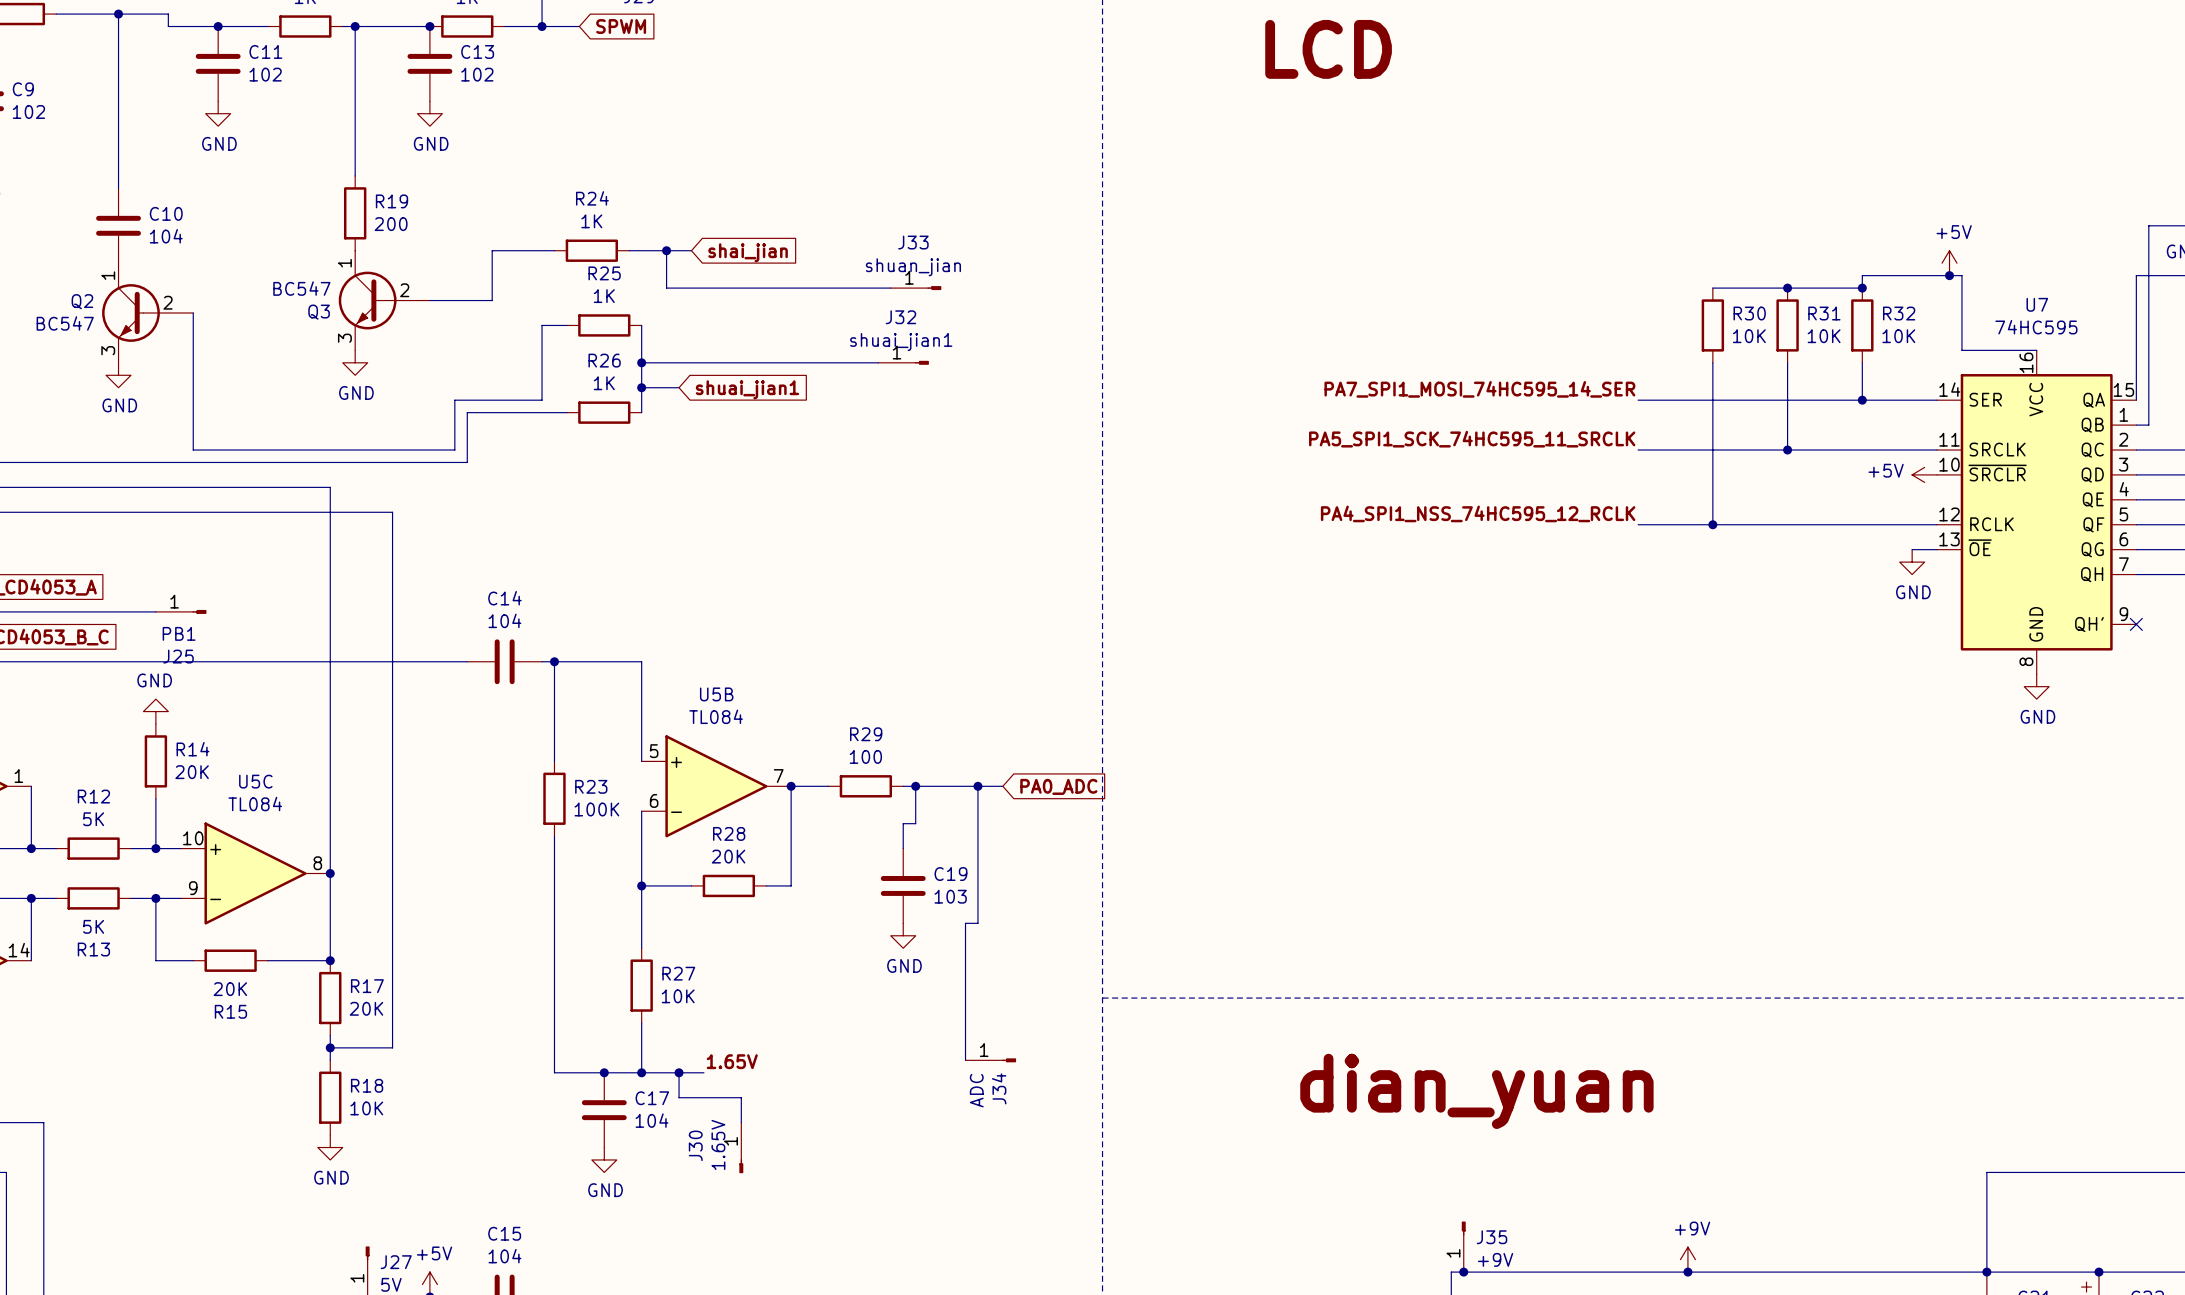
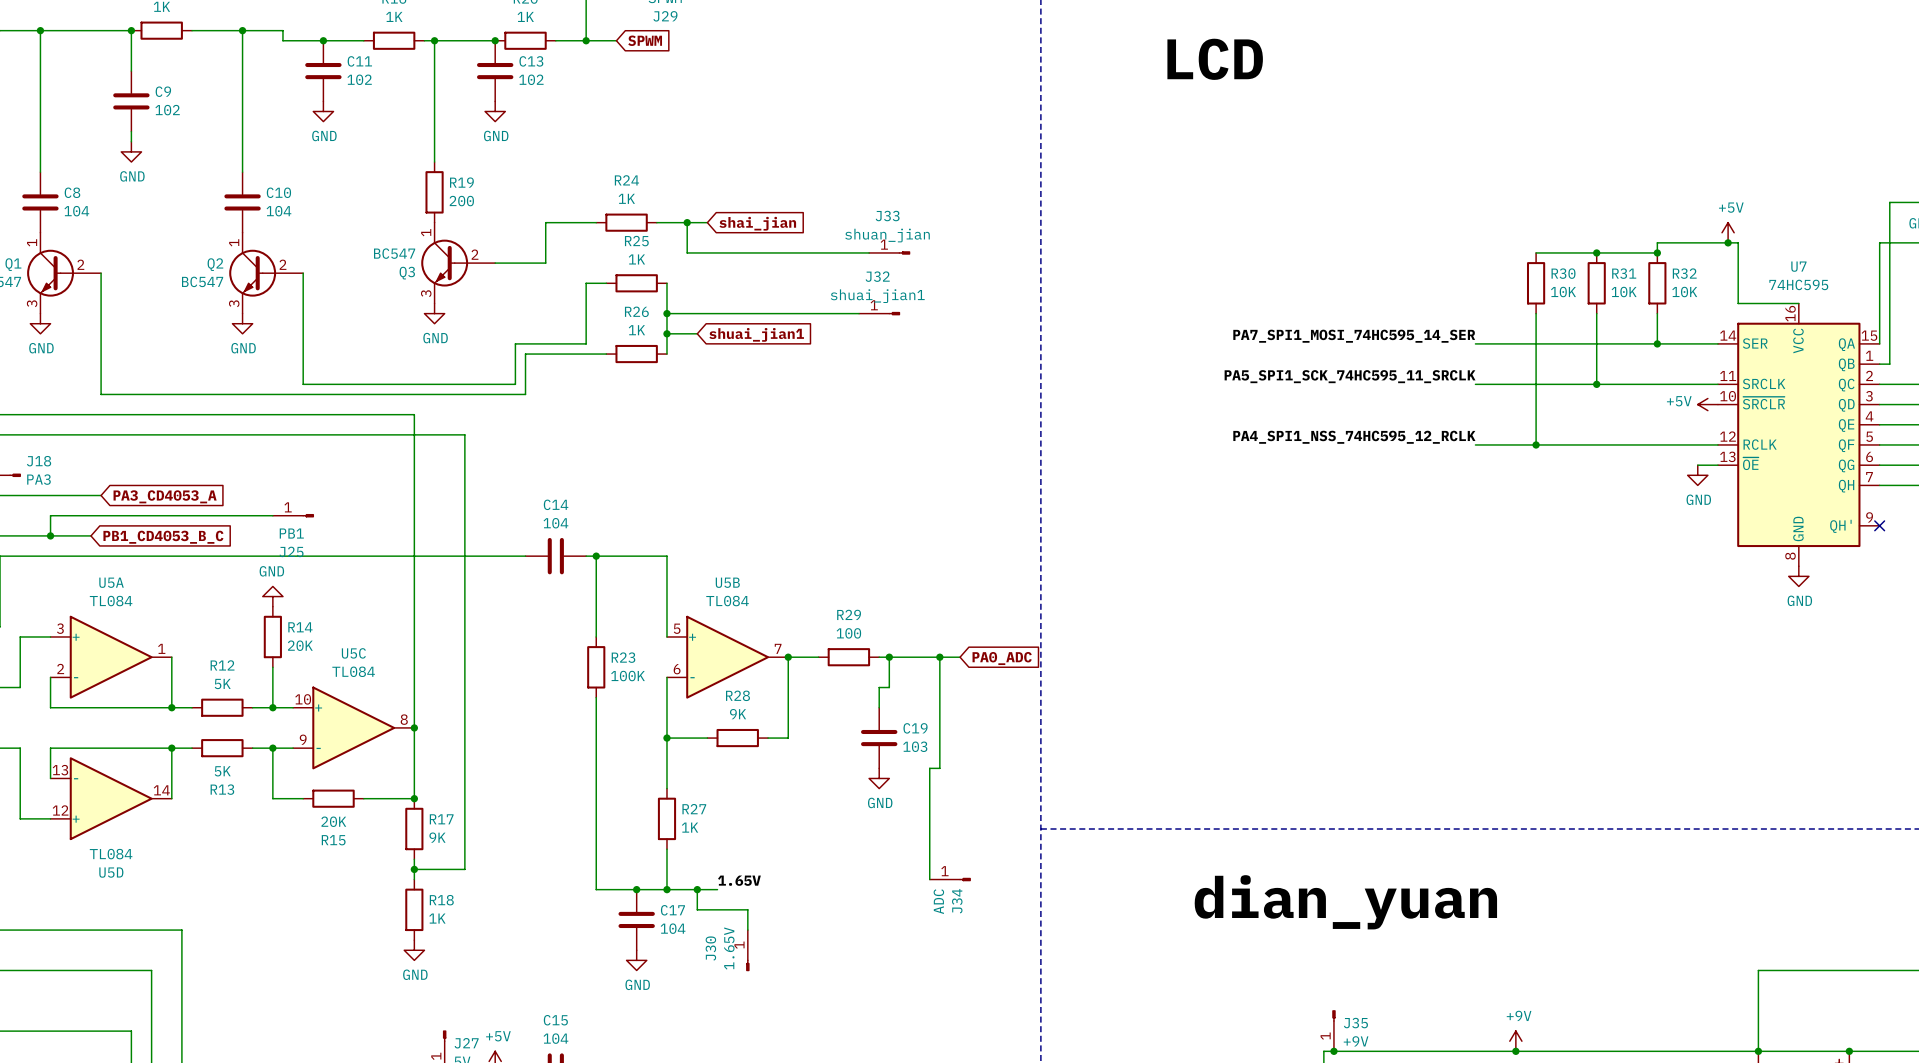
R28 value: 20K (728, 856) -> 9K (738, 714)
R27 value: 10K (678, 996) -> 1K (690, 827)
R17 value: 20K (366, 1008) -> 9K (437, 837)
R18 value: 10K (366, 1108) -> 1K (437, 918)

